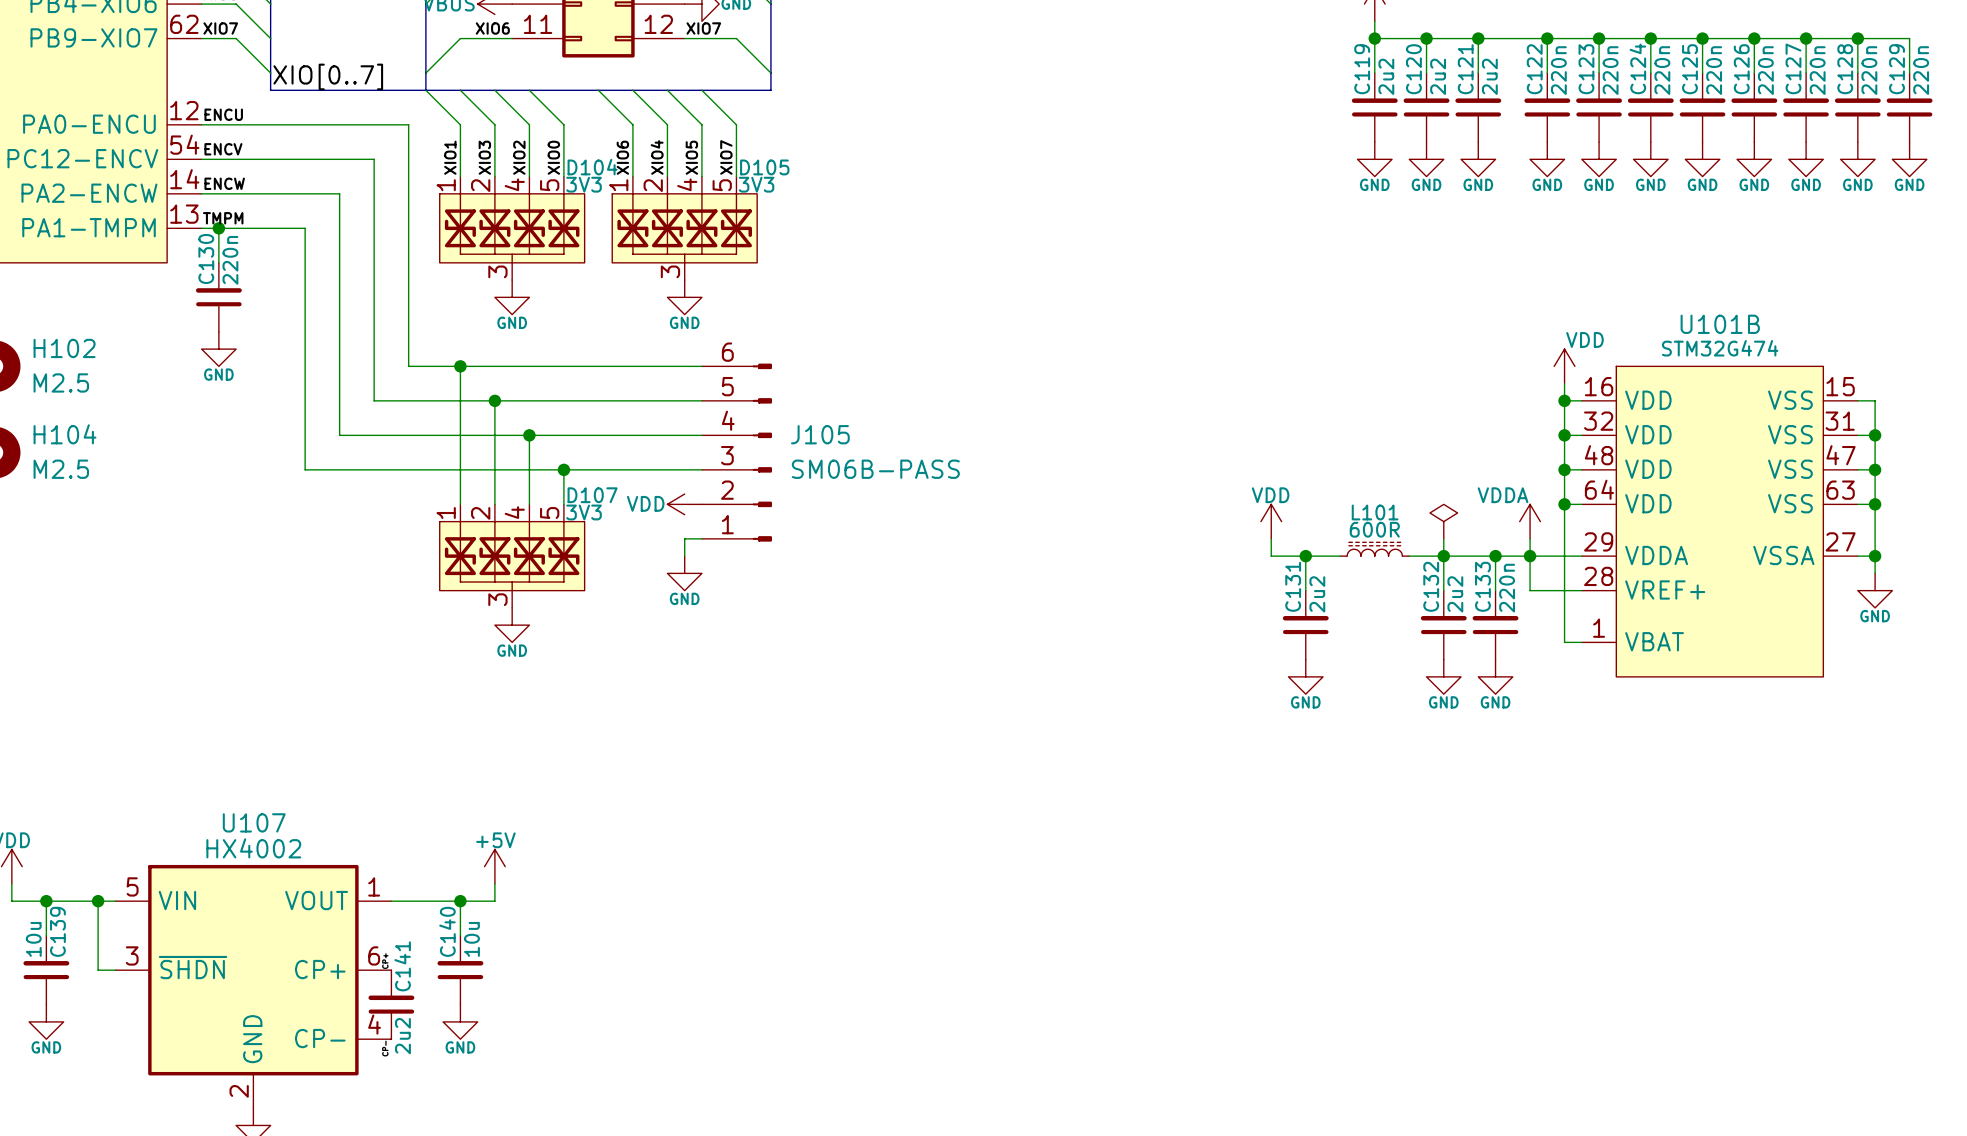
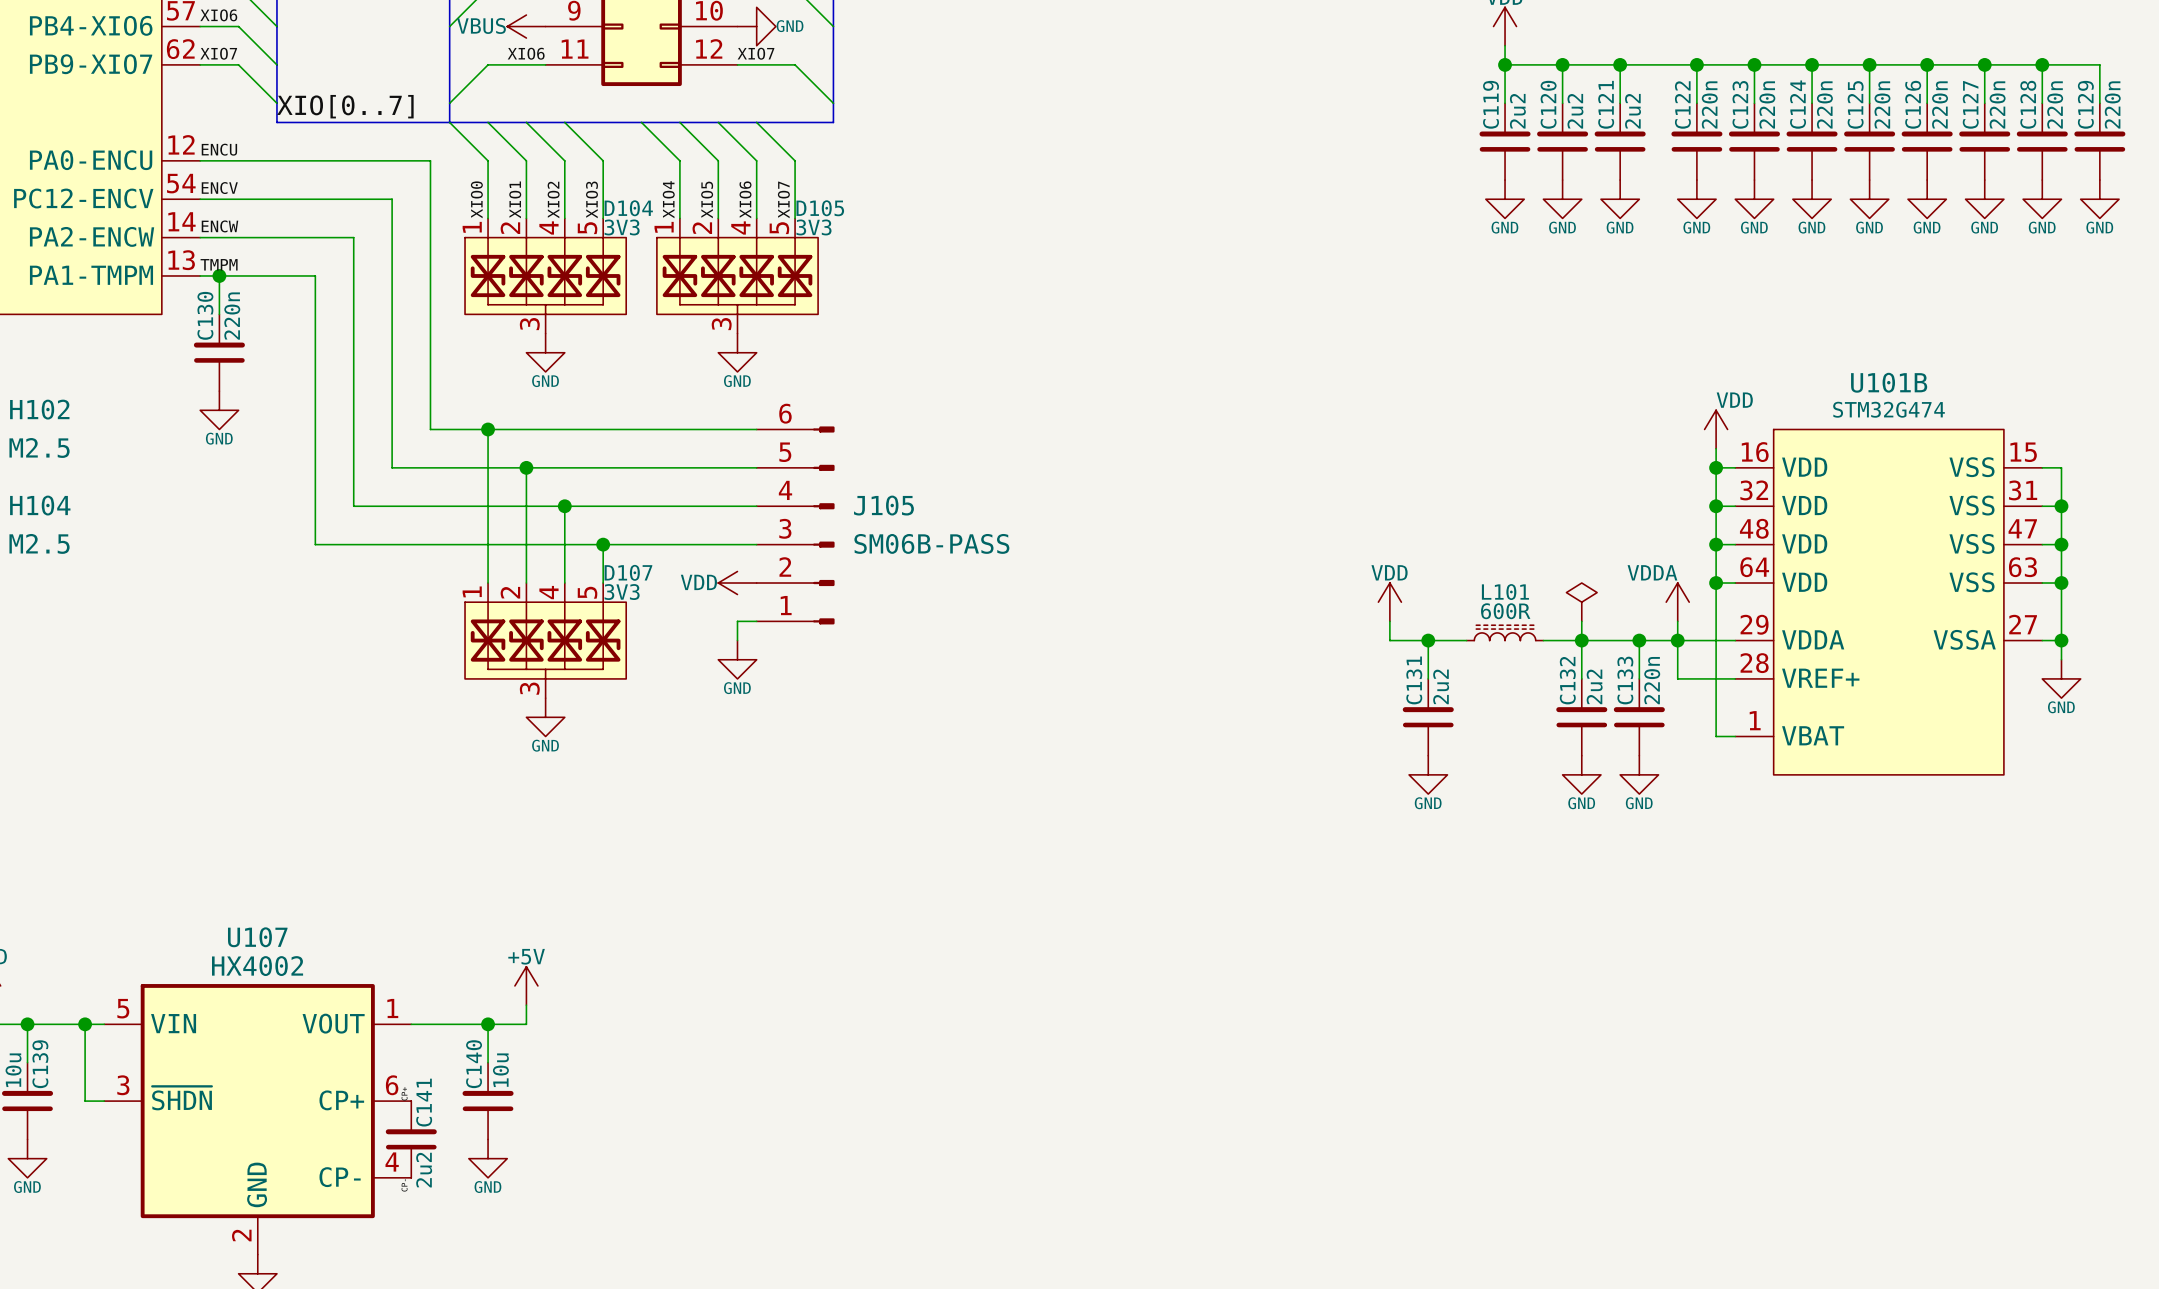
label: XIO1 (450, 157) -> XIO0 (476, 199)
label: XIO3 (484, 157) -> XIO1 (515, 199)
label: XIO0 (553, 157) -> XIO3 (591, 199)
label: XIO6 (622, 157) -> XIO4 (668, 199)
label: XIO4 (657, 157) -> XIO5 (707, 199)
label: XIO5 (691, 157) -> XIO6 (745, 199)

